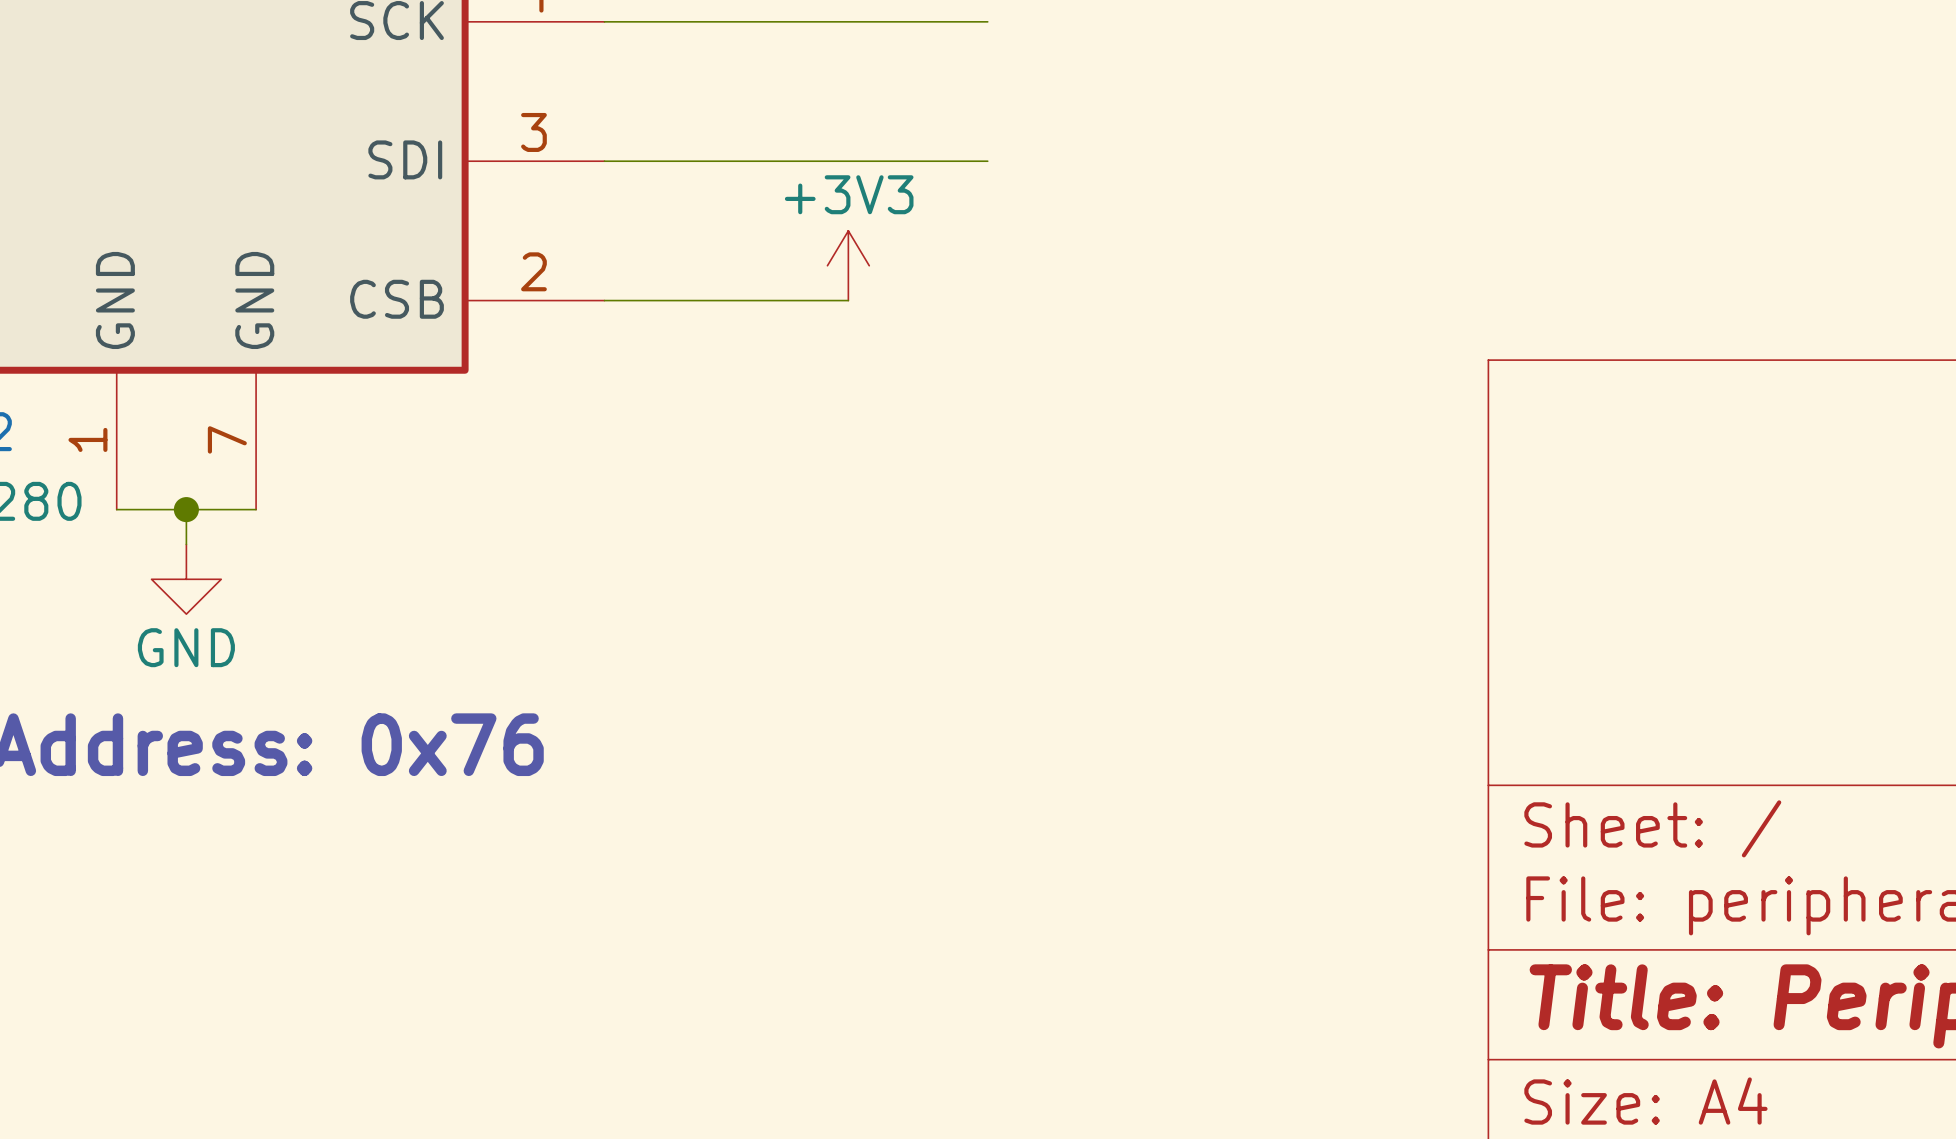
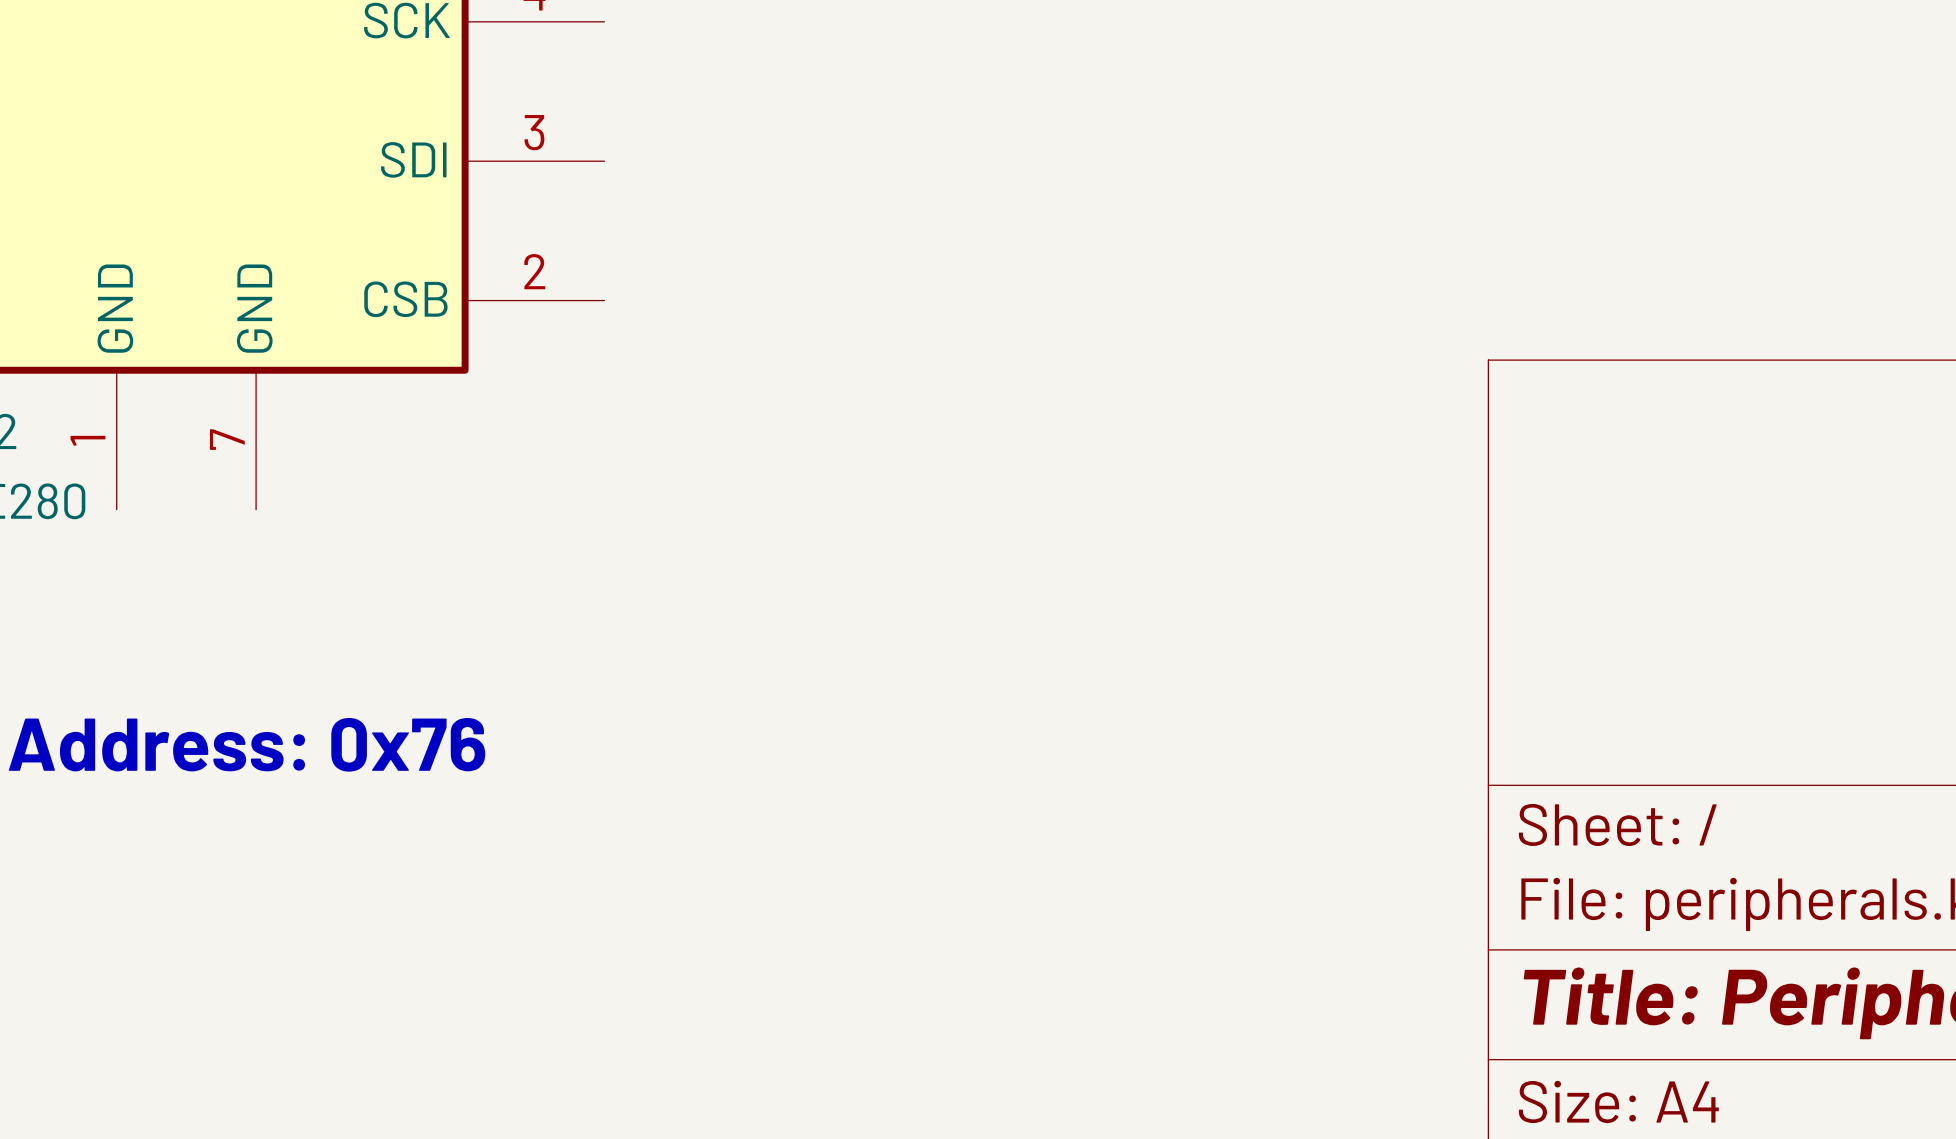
wire: (604, 21) (987, 21) -> none
wire: (604, 161) (987, 161) -> none
power symbol: +3V3 (848, 265) -> none
wire: (604, 300) (848, 300) -> none
wire: (116, 509) (256, 509) -> none
wire: (186, 509) (186, 544) -> none
junction: (186, 509) -> none
power symbol: GND (186, 579) -> none

